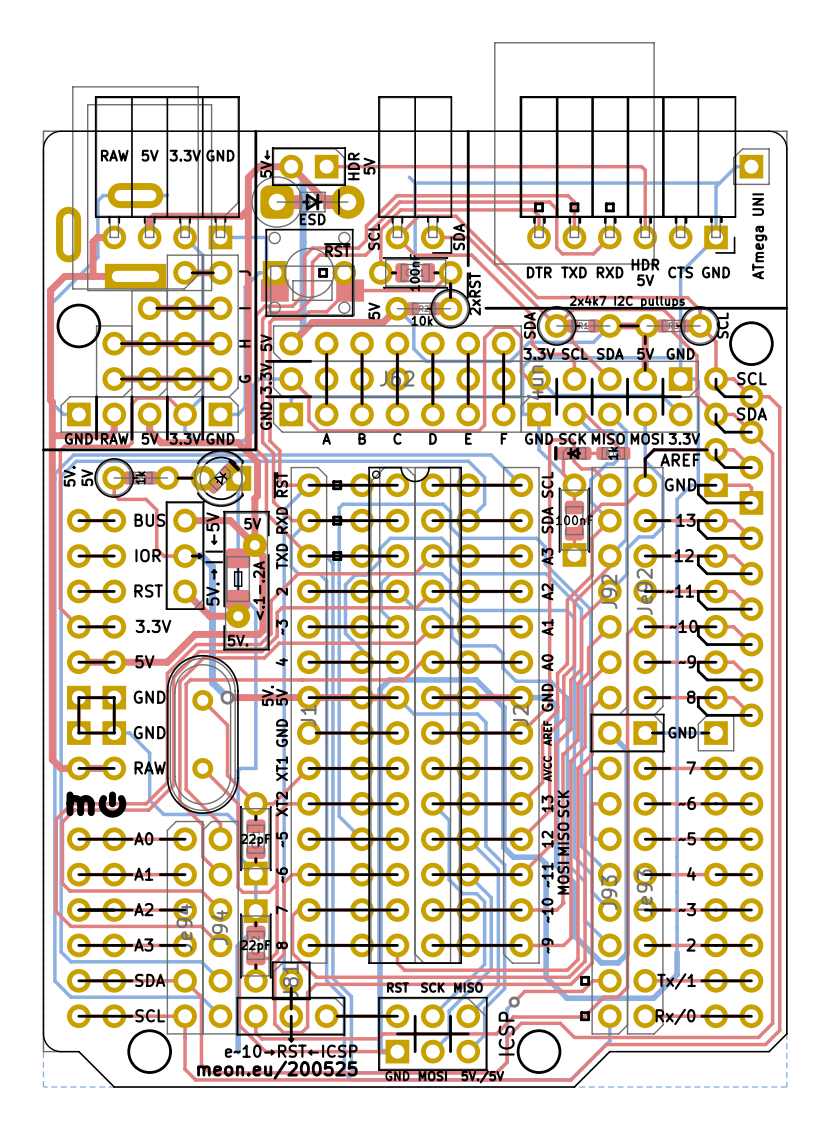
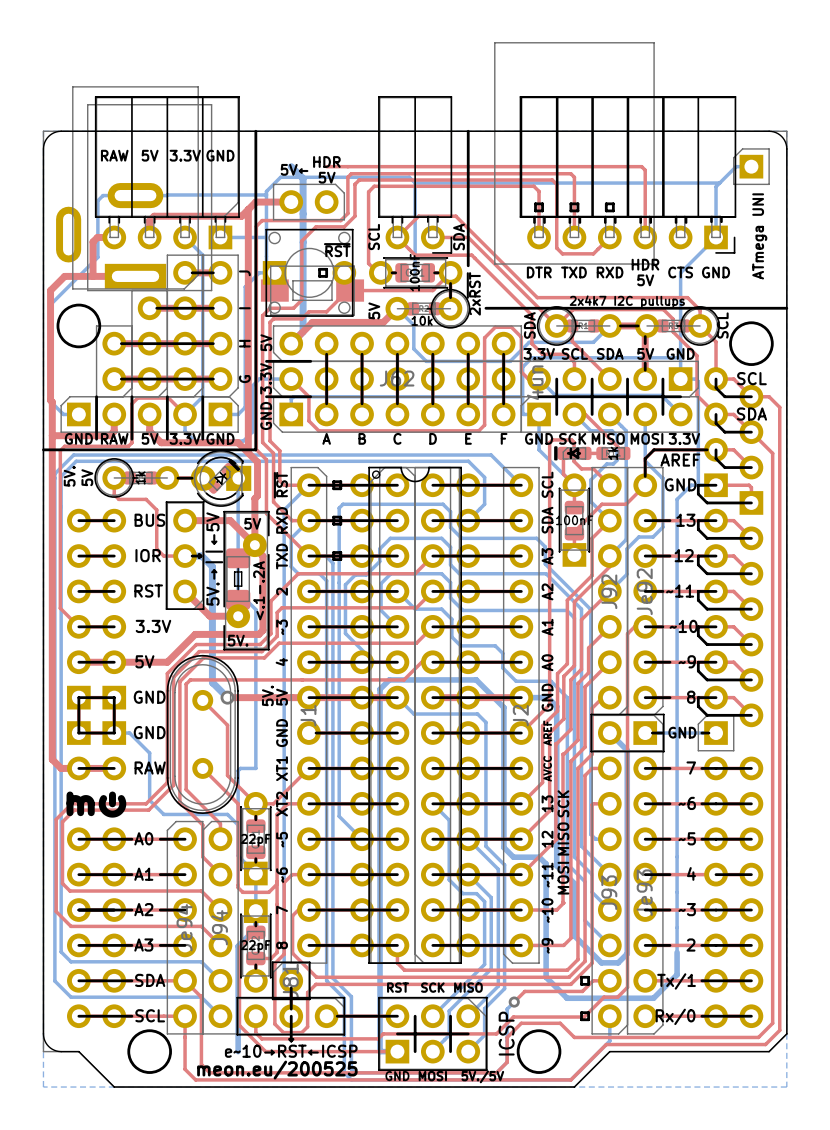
text rotation: 0° (266, 163) -> 90° clockwise (294, 169)
part: (308, 166) -> none
text rotation: 0° (353, 166) -> 90° clockwise (326, 161)
text rotation: 0° (369, 166) -> 90° clockwise (327, 177)
text position: 5V (369, 166) -> 5V (327, 177)
part footprint: [251, 176, 365, 228] -> [272, 183, 346, 221]
bottom track: none -> (409, 177) (280, 177) (266, 191)
bottom track: none -> (167, 194) (266, 194) (266, 237)
part: (313, 202) -> none
top track: (329, 202) (326, 202) (291, 166) (259, 166) (248, 177) (248, 209) -> (277, 202) (255, 202) (248, 209)
top track: (574, 202) (568, 195) (396, 195) (366, 226) (366, 240) (358, 248) (312, 248) (304, 256) (304, 294) (292, 306) (264, 306) (256, 314) -> (574, 202) (574, 177) (570, 173) (351, 173) (347, 177) (347, 213) (340, 220) (262, 220) (256, 226) (256, 314)
top track: (556, 209) (549, 202) (399, 202) (372, 229) (372, 248) (365, 255) (319, 255) (312, 262) (312, 297) (297, 312) (269, 312) (262, 319) -> (556, 209) (556, 184) (552, 180) (359, 180) (354, 184) (354, 216) (344, 226) (316, 226) (301, 241) (301, 299) (293, 308) (270, 308) (262, 315) (262, 319)
top track: (539, 216) (532, 209) (400, 209) (380, 229) (380, 272) -> (539, 216) (539, 191) (533, 186) (374, 186) (368, 191) (368, 263) (379, 272)
text: ESD (312, 219) -> none

